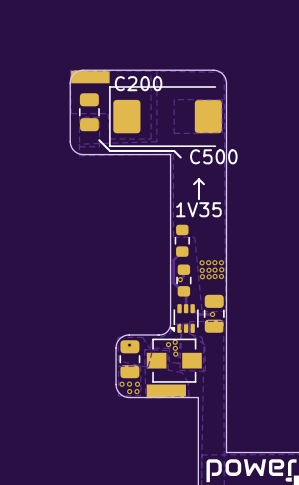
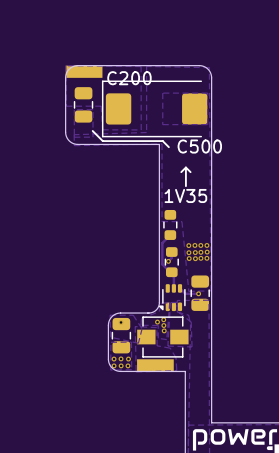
via: none -> (114, 365)

